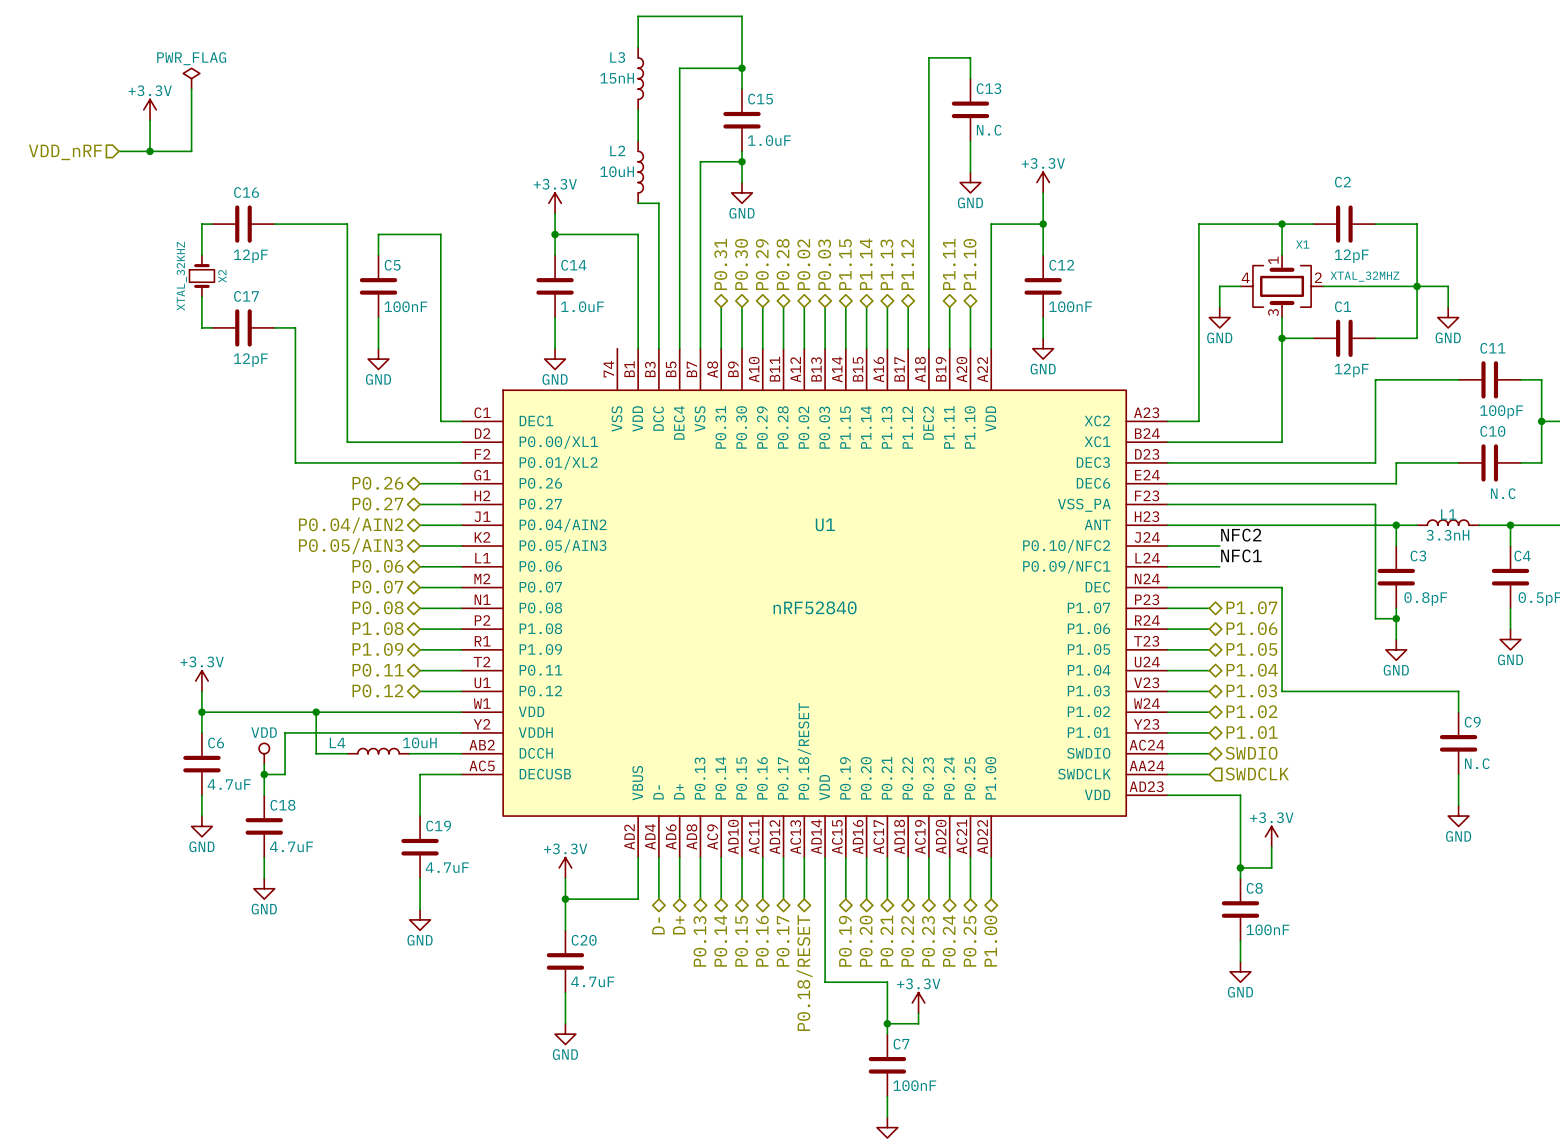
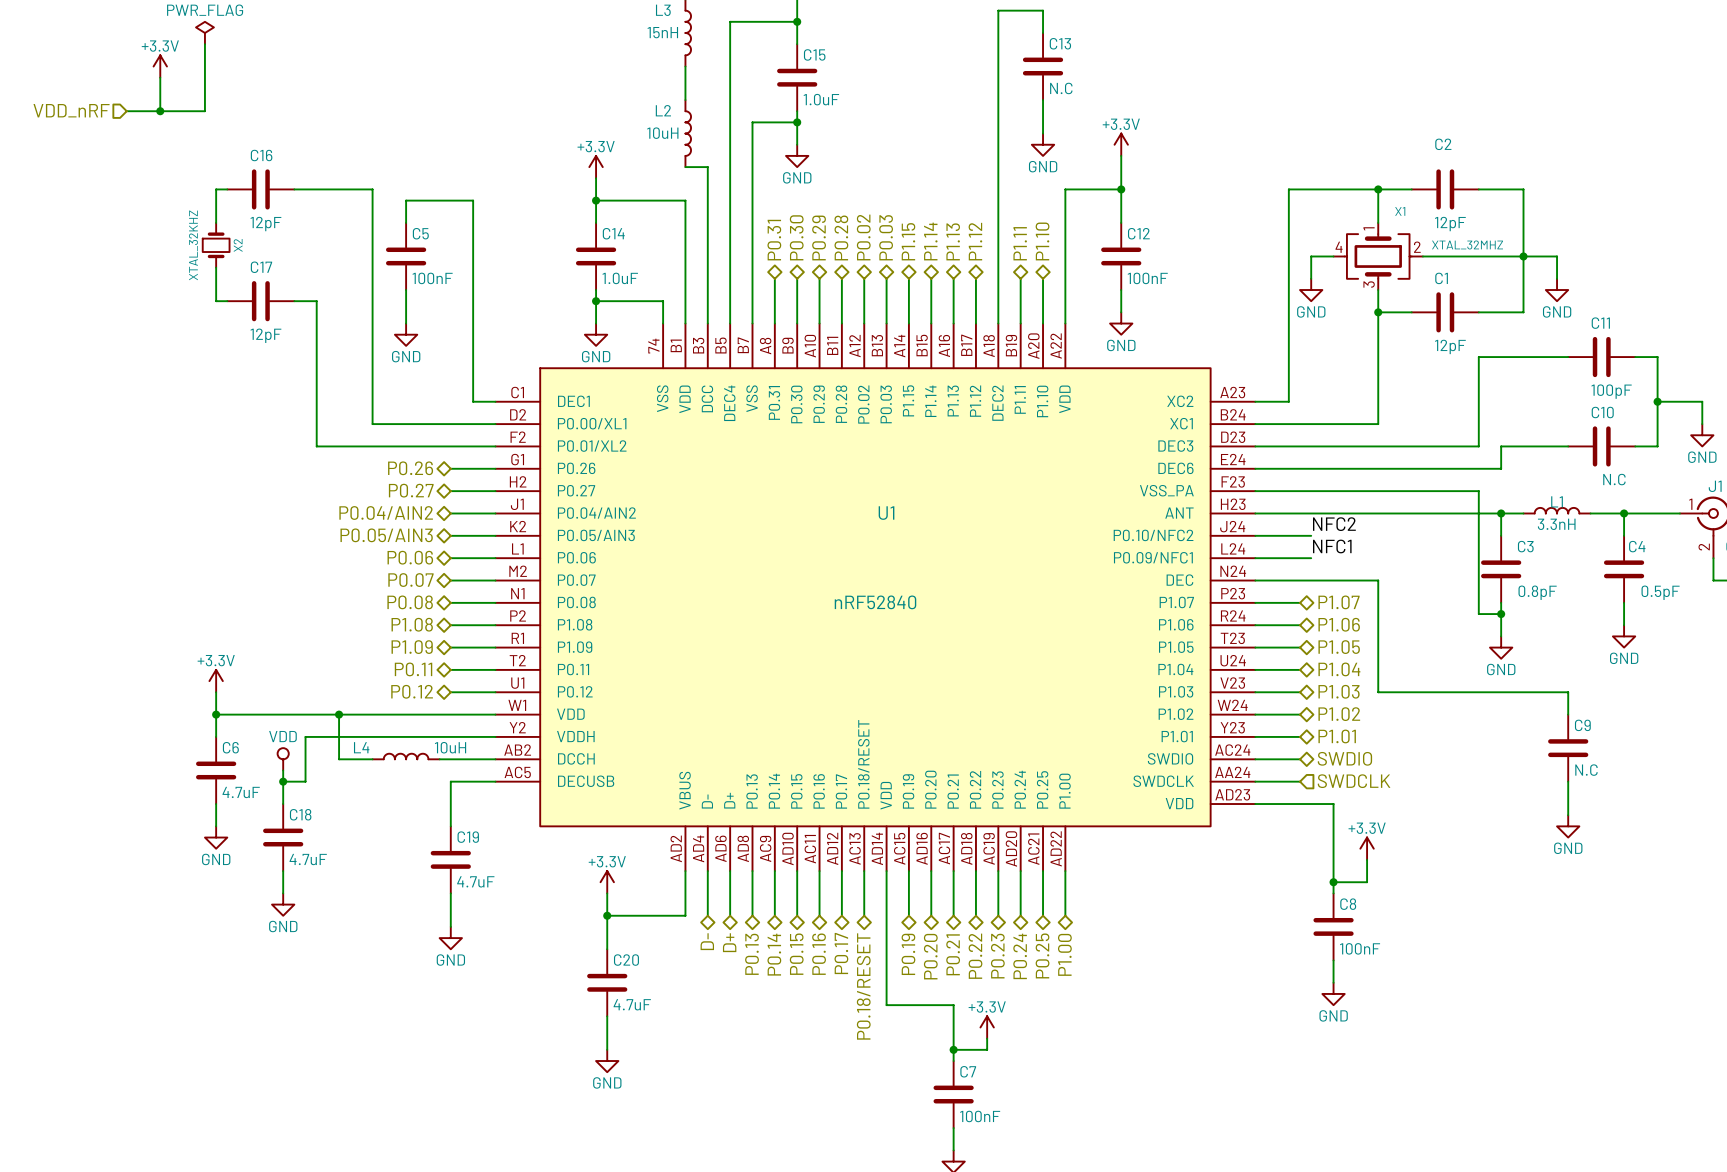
wire: none -> (596, 301) (663, 301) (663, 323)
junction: none -> (596, 301)

